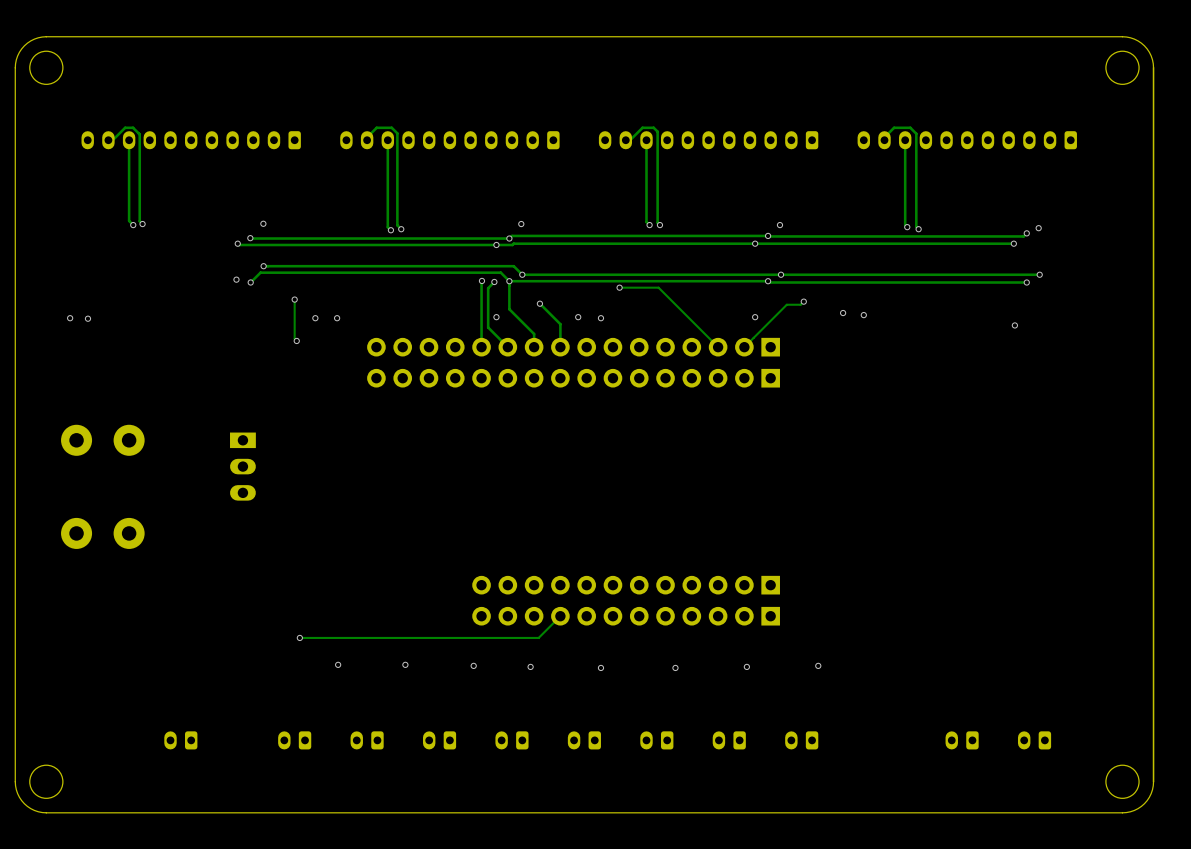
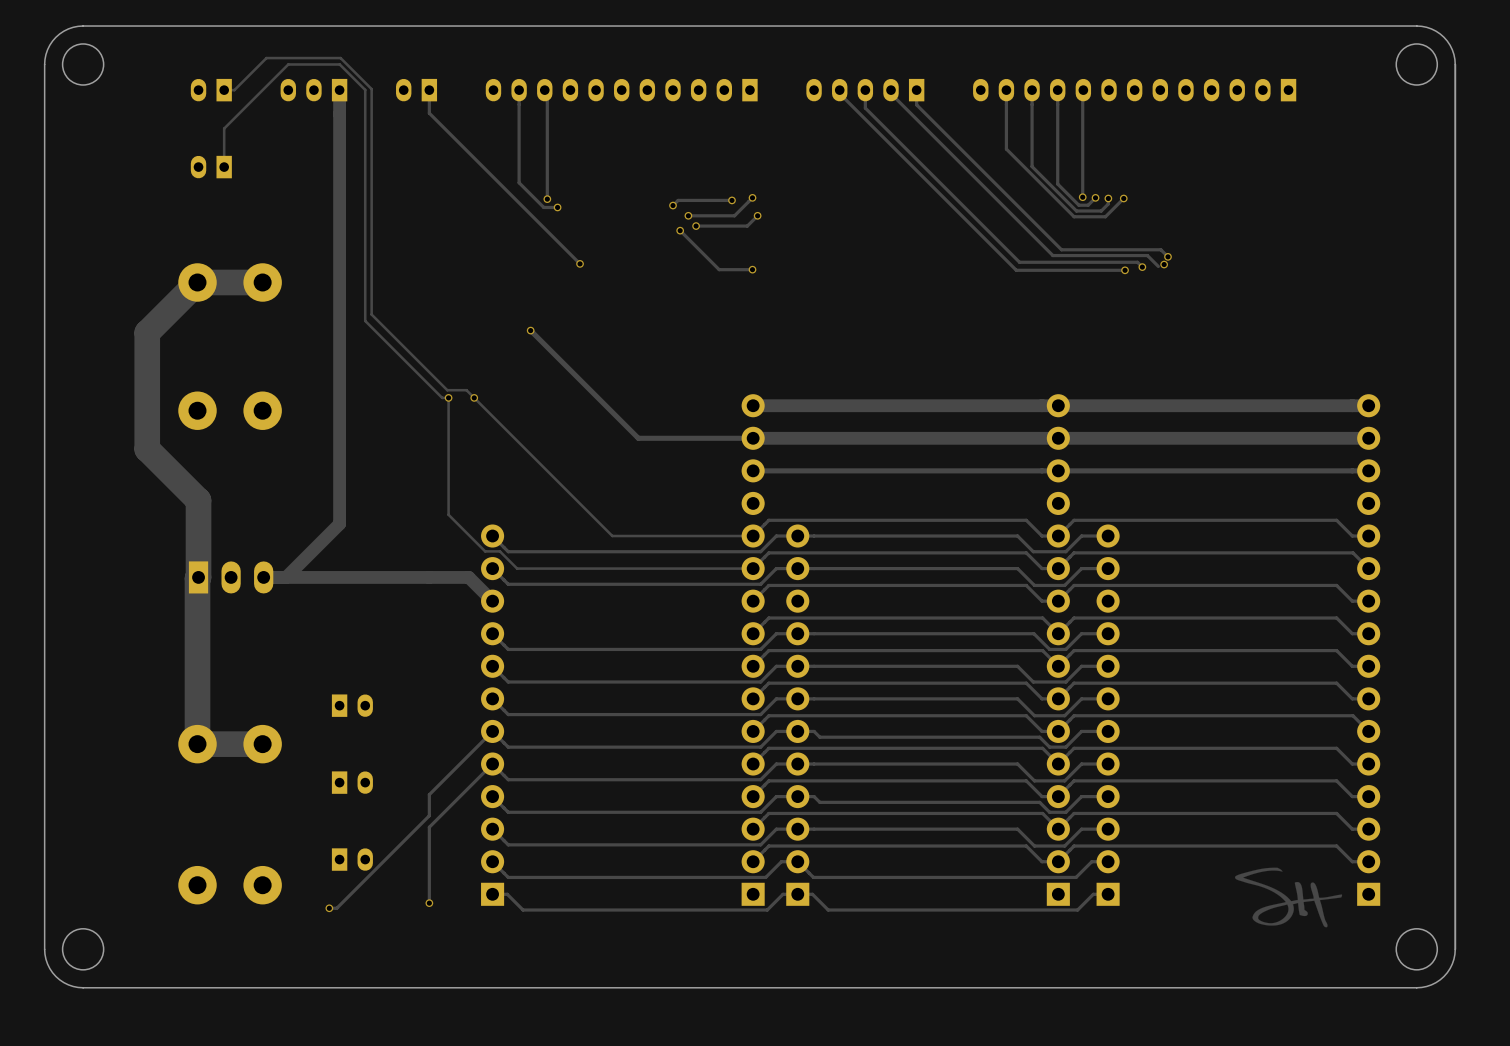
part: none -> (211, 90)
track: none -> (224, 90) (234, 90) (266, 58) (340, 58) (371, 89) (371, 314) (447, 390) (466, 390) (612, 536) (753, 536) (768, 520) (1026, 520) (1042, 536) (1058, 536) (1074, 520) (1336, 520) (1352, 536) (1368, 536)
part: none -> (313, 90)
track: none -> (339, 90) (339, 523) (286, 577)
part: none -> (416, 90)
track: none -> (429, 90) (429, 113) (580, 263)
track: none -> (519, 90) (519, 182) (543, 207) (557, 207)
track: none -> (544, 90) (547, 92) (547, 199)
part: none -> (621, 90)
track: none -> (839, 90) (839, 93) (1016, 270) (1125, 270)
track: none -> (865, 90) (865, 108) (1019, 262) (1137, 262) (1142, 267)
part: none -> (865, 90)
track: none -> (891, 90) (891, 93) (1052, 255) (1147, 255) (1158, 266)
track: none -> (916, 90) (916, 104) (1061, 249) (1160, 249) (1167, 256)
track: none -> (1006, 90) (1006, 149) (1074, 216) (1105, 216) (1123, 198)
track: none -> (1032, 90) (1032, 166) (1076, 211) (1101, 211) (1108, 203) (1108, 198)
track: none -> (1057, 90) (1057, 184) (1078, 205) (1088, 205) (1095, 197)
track: none -> (1083, 90) (1082, 197)
part: none -> (1134, 90)
track: (108, 140) (112, 140) (125, 127) (133, 127) (139, 134) (139, 221) (142, 224) -> none
track: (129, 140) (129, 220) (133, 225) -> none
part: (191, 140) -> none
track: (367, 140) (367, 137) (376, 127) (391, 127) (397, 133) (397, 225) (401, 229) -> none
track: (387, 140) (387, 227) (390, 230) -> none
part: (449, 140) -> none
track: (625, 140) (630, 140) (642, 127) (653, 127) (657, 131) (657, 222) (659, 225) -> none
track: (646, 140) (646, 221) (649, 225) -> none
part: (708, 140) -> none
track: (884, 140) (884, 137) (894, 127) (910, 127) (916, 133) (916, 226) (918, 229) -> none
track: (905, 140) (905, 225) (907, 227) -> none
part: (967, 140) -> none
part: none -> (211, 167)
track: none -> (224, 167) (224, 128) (288, 64) (339, 64) (365, 89) (365, 320) (442, 397) (448, 397) (448, 514) (485, 551) (499, 551) (517, 568) (753, 568) (768, 552) (1026, 552) (1042, 568) (1058, 568) (1074, 552) (1352, 552) (1368, 568)
via: none -> (1082, 197)
track: none -> (752, 197) (734, 215) (688, 215)
via: none -> (752, 197)
via: none -> (1095, 197)
via: none -> (1108, 198)
via: none -> (1123, 198)
via: none -> (547, 199)
track: none -> (731, 200) (678, 200) (673, 205)
via: none -> (731, 200)
via: none -> (673, 205)
via: none -> (557, 207)
via: none -> (688, 215)
track: none -> (757, 215) (747, 226) (696, 226)
via: none -> (757, 215)
via: none -> (696, 226)
track: none -> (680, 230) (719, 269) (752, 269)
via: none -> (680, 230)
via: (263, 223) -> none
via: none -> (1167, 256)
via: (142, 224) -> none
via: (521, 224) -> none
via: (133, 225) -> none
via: (649, 225) -> none
via: (659, 225) -> none
via: (779, 225) -> none
via: (907, 227) -> none
via: none -> (580, 263)
via: (1038, 228) -> none
via: (401, 229) -> none
via: (390, 230) -> none
via: none -> (1142, 267)
via: none -> (752, 269)
via: none -> (1125, 270)
track: (1026, 233) (1023, 236) (511, 235) (509, 238) (250, 238) -> none
via: (1026, 233) -> none
via: (768, 235) -> none
via: (250, 238) -> none
via: (509, 238) -> none
part: none -> (230, 282)
track: none -> (262, 282) (197, 282) (147, 332) (147, 449) (198, 500) (197, 744) (262, 744)
via: (237, 243) -> none
via: (755, 243) -> none
track: (1013, 243) (237, 243) -> none
via: (1013, 243) -> none
via: (496, 244) -> none
track: (263, 266) (513, 266) (522, 274) (1039, 274) -> none
via: (263, 266) -> none
via: (522, 274) -> none
via: (781, 274) -> none
via: (1039, 274) -> none
via: (236, 279) -> none
track: (481, 280) (481, 347) -> none
via: (481, 280) -> none
track: (494, 281) (488, 288) (488, 327) (507, 347) -> none
via: (494, 281) -> none
track: (509, 281) (1026, 282) -> none
track: (509, 281) (509, 309) (534, 334) (534, 347) -> none
track: (509, 281) (500, 272) (260, 272) (250, 282) -> none
via: (509, 281) -> none
via: (768, 281) -> none
via: (250, 282) -> none
track: none -> (530, 330) (638, 438) (1368, 438)
via: none -> (530, 330)
via: (1026, 282) -> none
track: (619, 287) (658, 287) (718, 347) -> none
via: (619, 287) -> none
track: (294, 299) (294, 338) (296, 340) -> none
via: (294, 299) -> none
track: (803, 301) (800, 304) (786, 304) (744, 347) -> none
via: (803, 301) -> none
track: (539, 303) (560, 324) (560, 347) -> none
via: (539, 303) -> none
via: (843, 313) -> none
via: (863, 315) -> none
via: (496, 317) -> none
via: (578, 317) -> none
via: (755, 317) -> none
via: (70, 318) -> none
via: (87, 318) -> none
via: (315, 318) -> none
via: (337, 318) -> none
via: (600, 318) -> none
via: (1014, 325) -> none
via: none -> (448, 397)
via: none -> (474, 397)
via: (296, 340) -> none
track: none -> (1368, 405) (753, 405)
part: none -> (230, 410)
part: (573, 347) -> none
part: (573, 378) -> none
track: none -> (1368, 470) (753, 470)
part: (102, 440) -> none
track: none -> (1108, 536) (1081, 536) (1065, 551) (1033, 551) (1017, 536) (776, 536) (760, 551) (508, 551) (492, 536)
part rotation: 0° (242, 466) -> 90° counterclockwise (231, 577)
part position: (242, 466) -> (231, 577)
track: none -> (1108, 568) (1081, 568) (1064, 585) (1034, 585) (1017, 568) (776, 568) (760, 584) (508, 584) (492, 568)
track: none -> (263, 577) (468, 577) (492, 601)
track: none -> (1368, 601) (1352, 601) (1336, 585) (1074, 585) (1058, 601) (1042, 601) (1026, 585) (768, 585) (753, 601)
track: none -> (1108, 633) (1081, 633) (1065, 649) (1049, 649) (1033, 633) (776, 633) (760, 649) (508, 649) (492, 633)
track: none -> (1368, 633) (1352, 633) (1336, 618) (1074, 618) (1058, 633) (1042, 618) (768, 618) (753, 633)
part: (102, 533) -> none
part: none -> (753, 650)
part: none -> (1058, 650)
part: none -> (1368, 650)
track: none -> (1108, 666) (1081, 666) (1065, 682) (1033, 682) (1017, 666) (776, 666) (760, 682) (508, 682) (492, 666)
track: none -> (1368, 666) (1352, 666) (1336, 650) (1074, 650) (1058, 666) (1042, 650) (768, 650) (753, 666)
track: none -> (1108, 698) (1081, 698) (1064, 715) (1034, 715) (1017, 698) (776, 698) (760, 714) (508, 714) (492, 698)
track: none -> (1368, 698) (1352, 698) (1336, 683) (1074, 683) (1058, 698) (1042, 698) (1026, 683) (768, 683) (753, 698)
part: none -> (352, 705)
part rotation: 0° (626, 585) -> 90° clockwise (797, 715)
part: none -> (492, 715)
part: none -> (1108, 715)
track: none -> (1108, 731) (1081, 731) (1065, 747) (1049, 747) (1039, 737) (819, 737) (814, 731) (776, 731) (760, 747) (508, 747) (492, 731) (429, 794) (429, 815) (336, 908) (329, 908)
track: none -> (1368, 731) (1352, 715) (1074, 715) (1058, 731) (1042, 731) (1026, 715) (768, 715) (753, 731)
part: none -> (230, 744)
track: (560, 616) (538, 637) (299, 637) -> none
part: (626, 616) -> none
track: none -> (1108, 764) (1081, 764) (1064, 780) (1034, 780) (1017, 764) (776, 764) (760, 779) (508, 779) (492, 764) (429, 827) (429, 903)
track: none -> (1368, 764) (1352, 764) (1336, 748) (1074, 748) (1058, 764) (1042, 748) (768, 748) (753, 764)
via: (299, 637) -> none
part: none -> (352, 782)
track: none -> (1108, 796) (1081, 796) (1065, 812) (1049, 812) (1039, 802) (819, 802) (814, 796) (776, 796) (760, 812) (508, 812) (492, 796)
track: none -> (1368, 796) (1352, 796) (1336, 780) (1074, 780) (1058, 796) (1042, 796) (1026, 780) (768, 780) (753, 796)
via: (338, 664) -> none
via: (405, 664) -> none
via: (473, 665) -> none
via: (818, 665) -> none
via: (530, 666) -> none
via: (746, 666) -> none
via: (600, 667) -> none
via: (675, 667) -> none
track: none -> (1108, 829) (1081, 829) (1064, 846) (1034, 846) (1017, 829) (776, 829) (760, 844) (508, 844) (492, 829)
track: none -> (1368, 829) (1352, 829) (1336, 813) (1074, 813) (1058, 829) (1042, 813) (768, 813) (753, 829)
part: none -> (352, 859)
track: none -> (1108, 861) (1091, 861) (1076, 877) (813, 877) (797, 861) (781, 861) (765, 877) (508, 877) (492, 861)
track: none -> (1368, 861) (1352, 861) (1336, 846) (1074, 846) (1058, 861) (1042, 861) (1026, 846) (768, 846) (753, 861)
drawing: none -> [1234, 867, 1343, 928]
part: none -> (230, 885)
track: none -> (1108, 894) (1093, 894) (1077, 910) (828, 910) (812, 894) (783, 894) (767, 910) (523, 910) (507, 894) (492, 894)
part: (180, 740) -> none
part: (294, 740) -> none
part: (367, 740) -> none
part: (439, 740) -> none
part: (511, 740) -> none
part: (584, 740) -> none
part: (656, 740) -> none
part: (729, 740) -> none
part: (801, 740) -> none
part: (962, 740) -> none
part: (1034, 740) -> none
via: none -> (429, 903)
via: none -> (329, 908)

